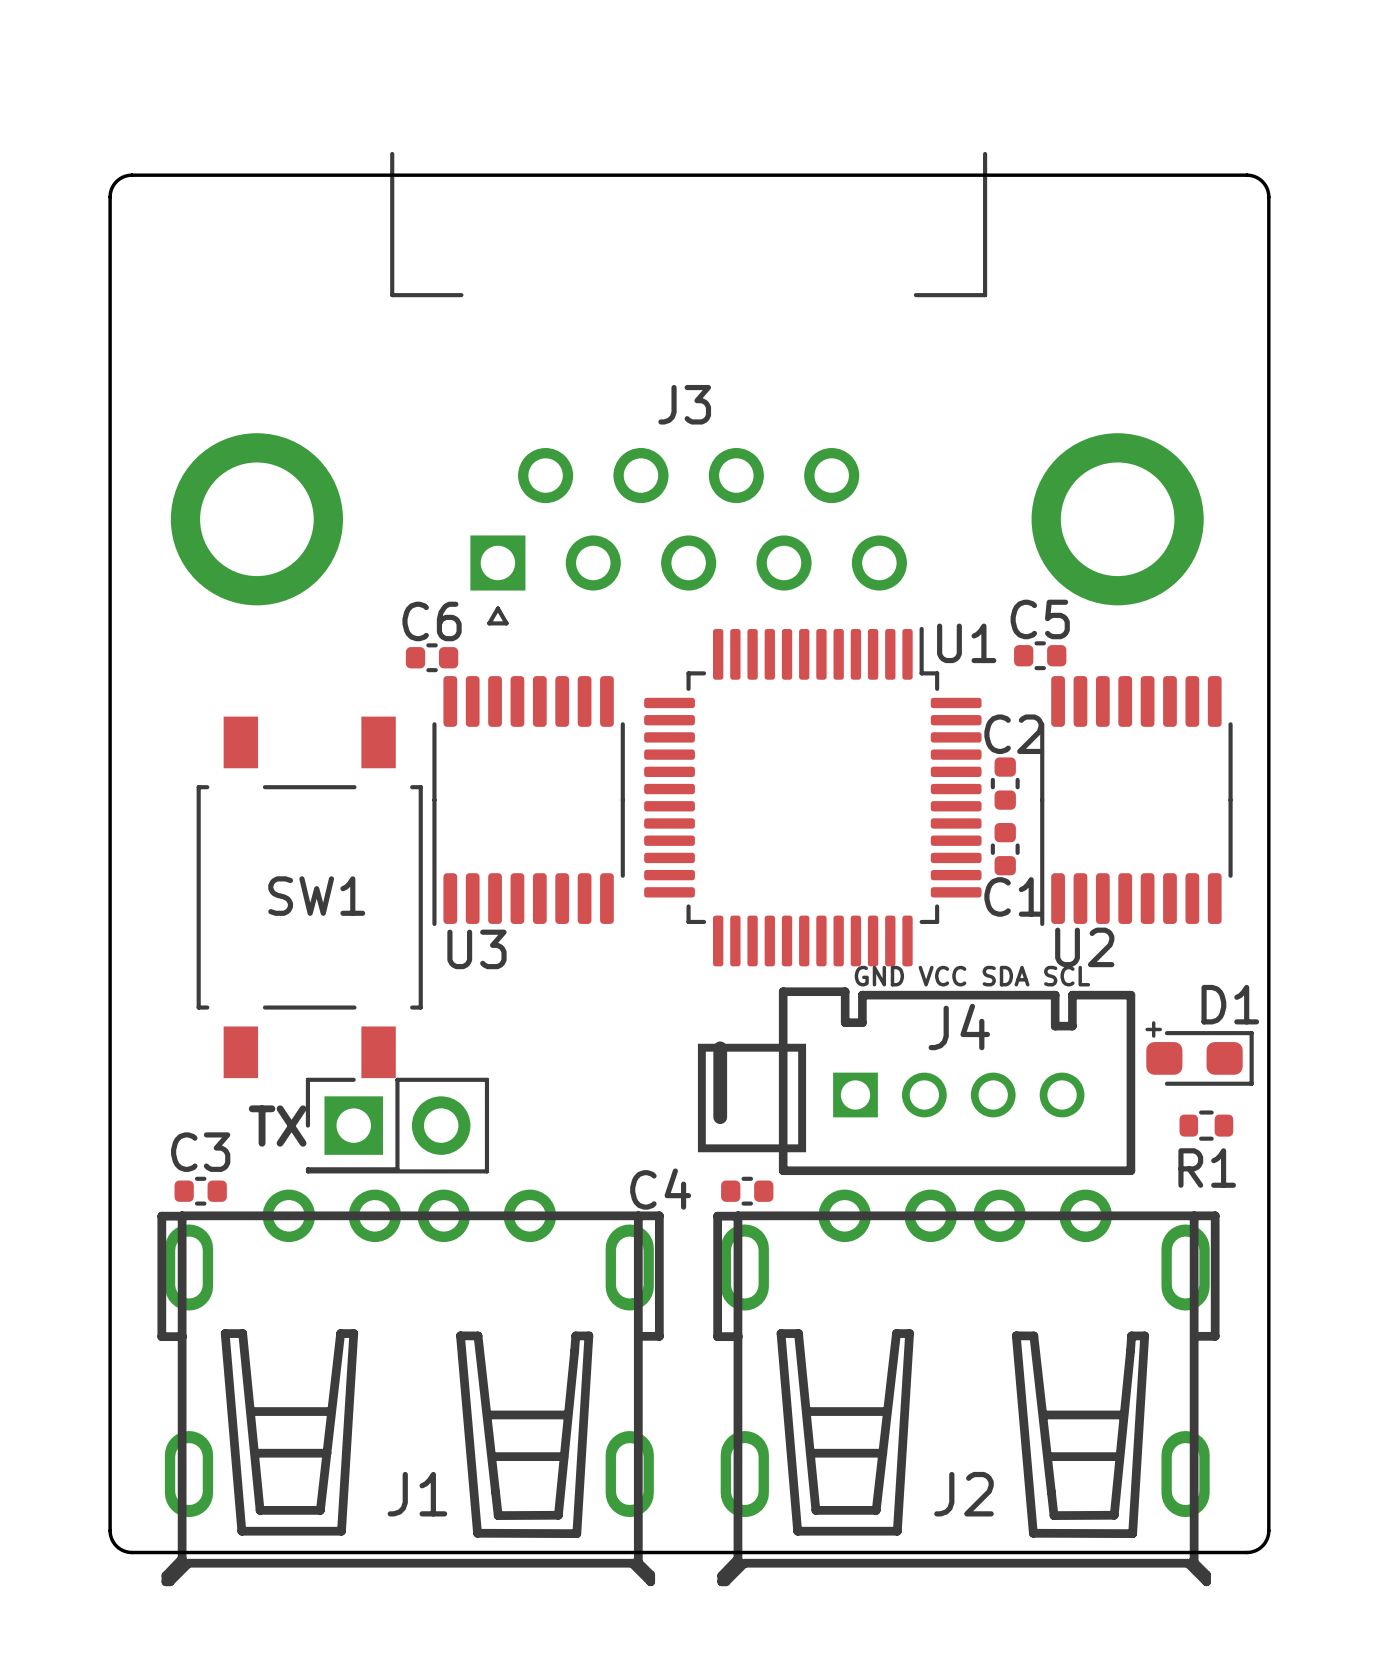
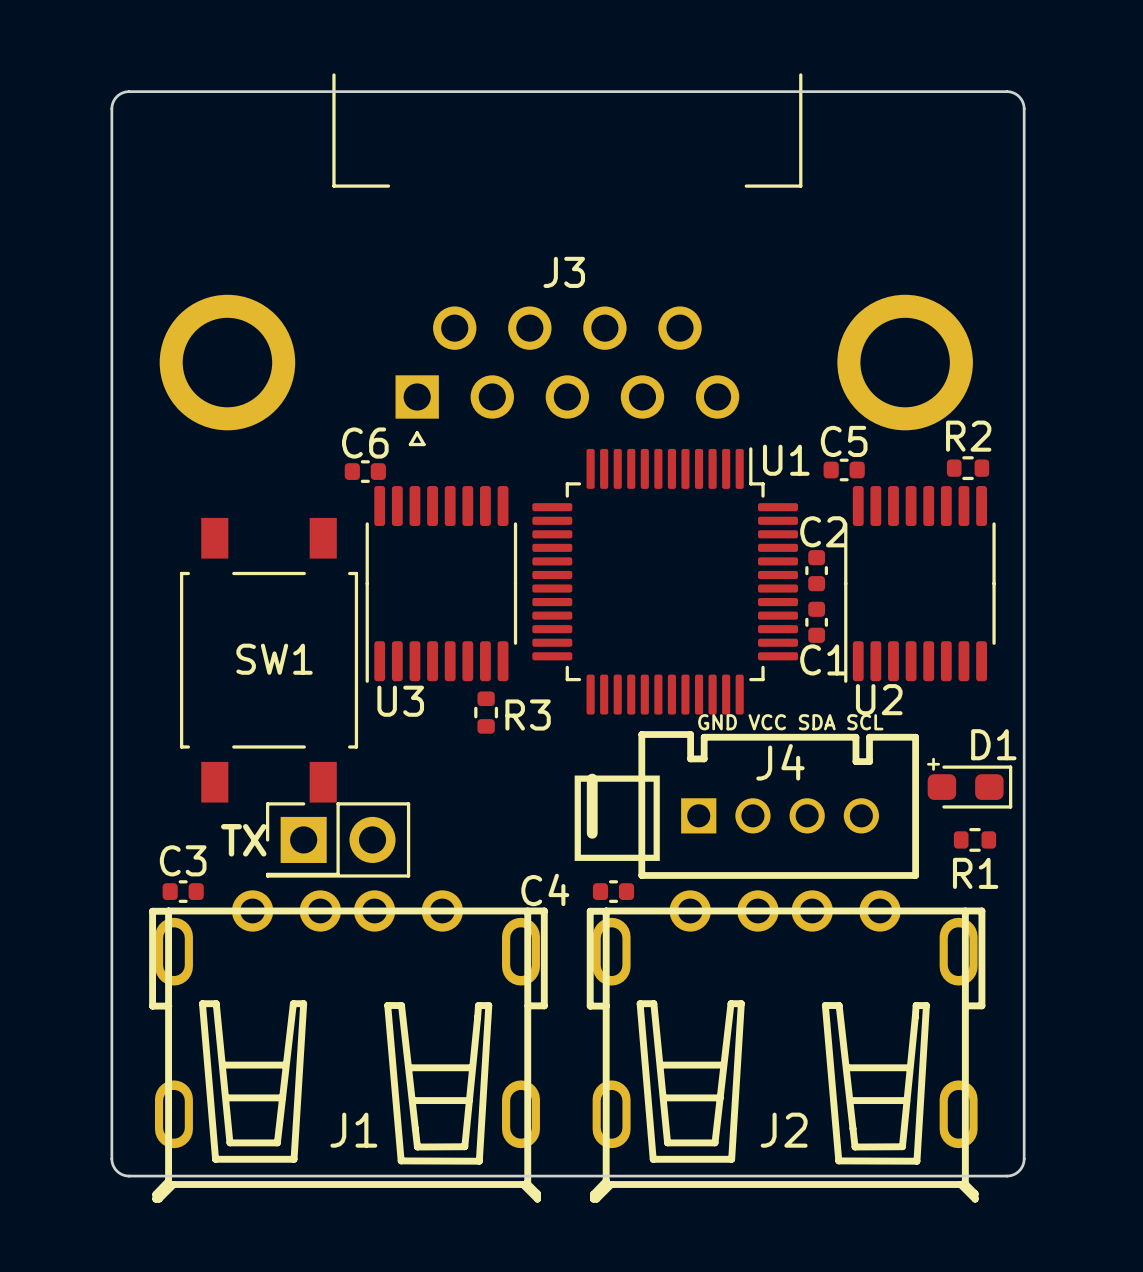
R2: none -> (968, 468)
R3: none -> (486, 712)

